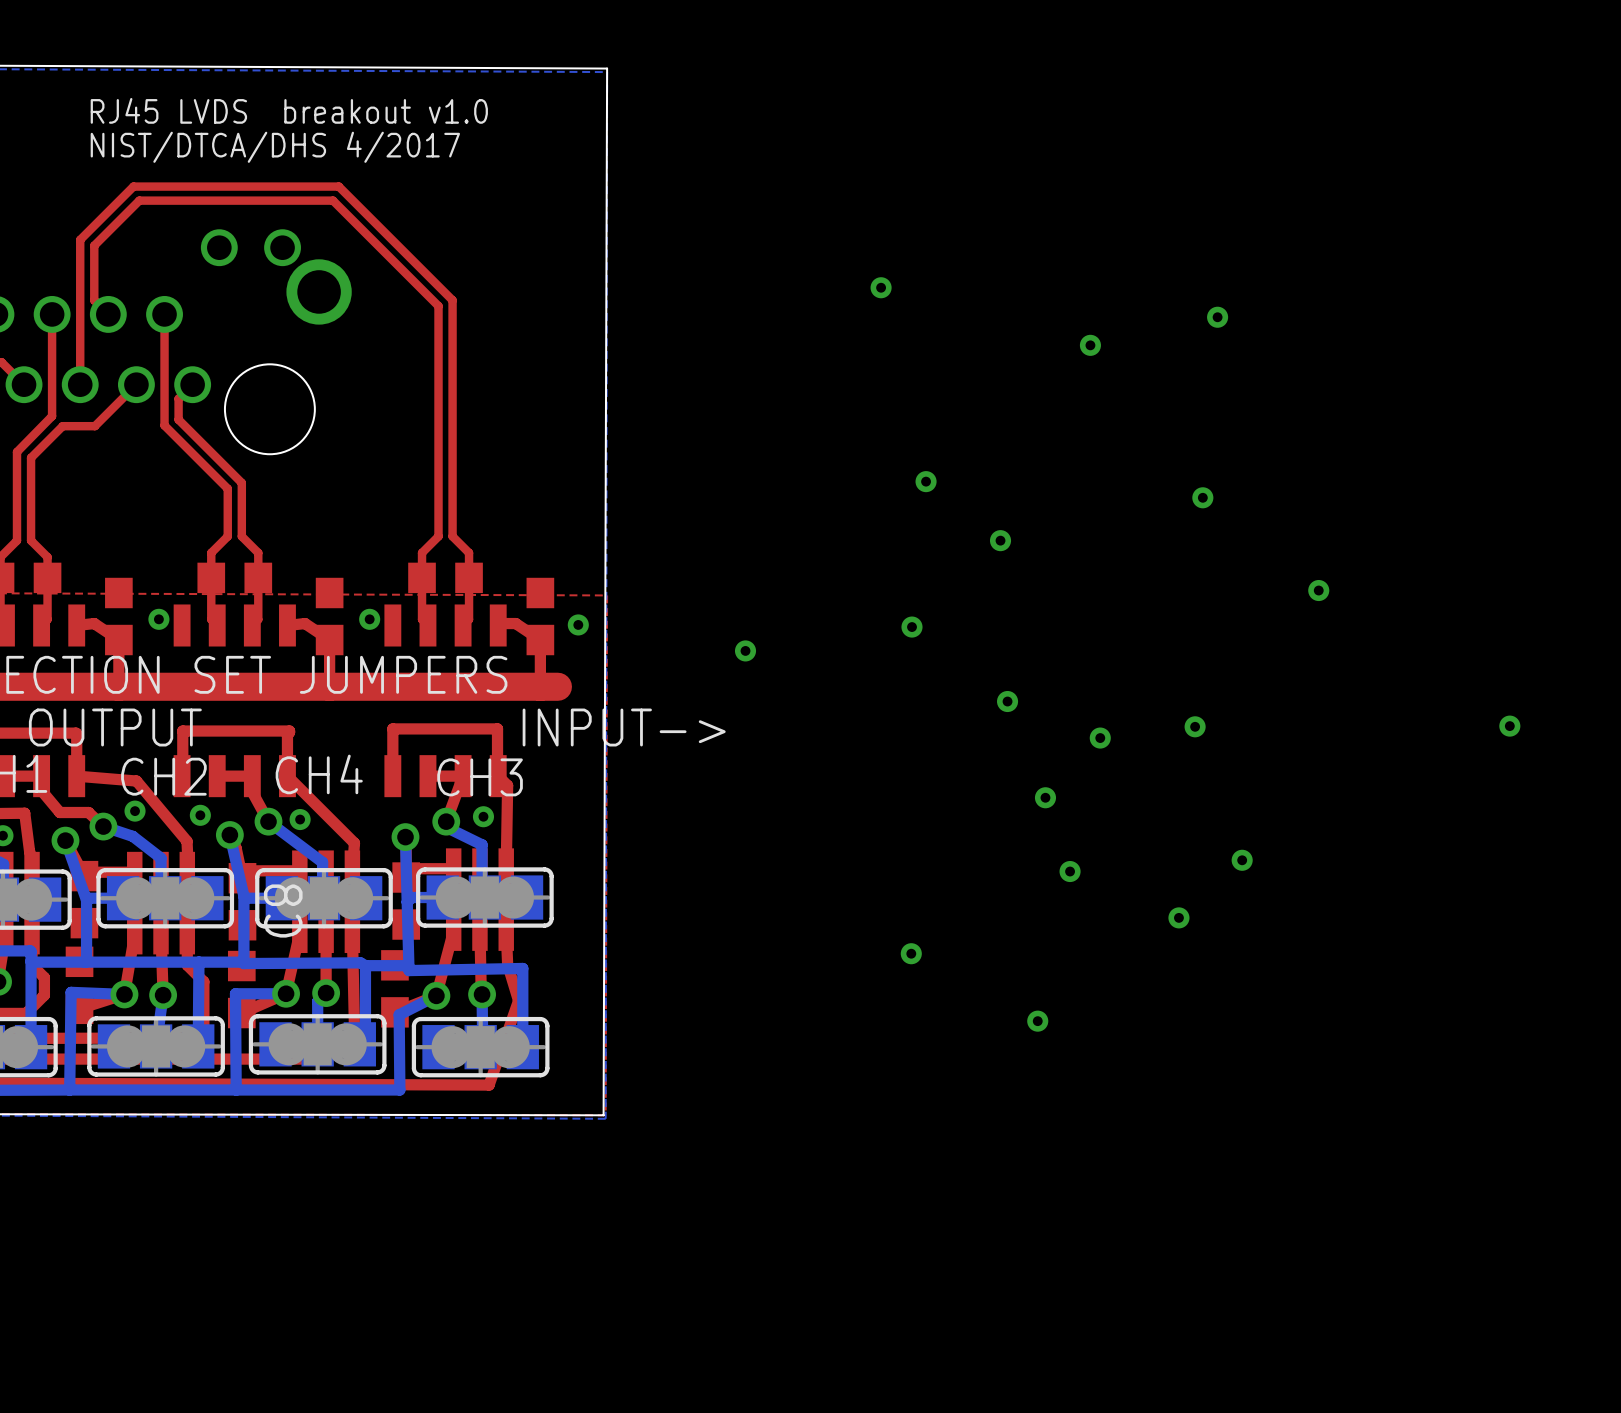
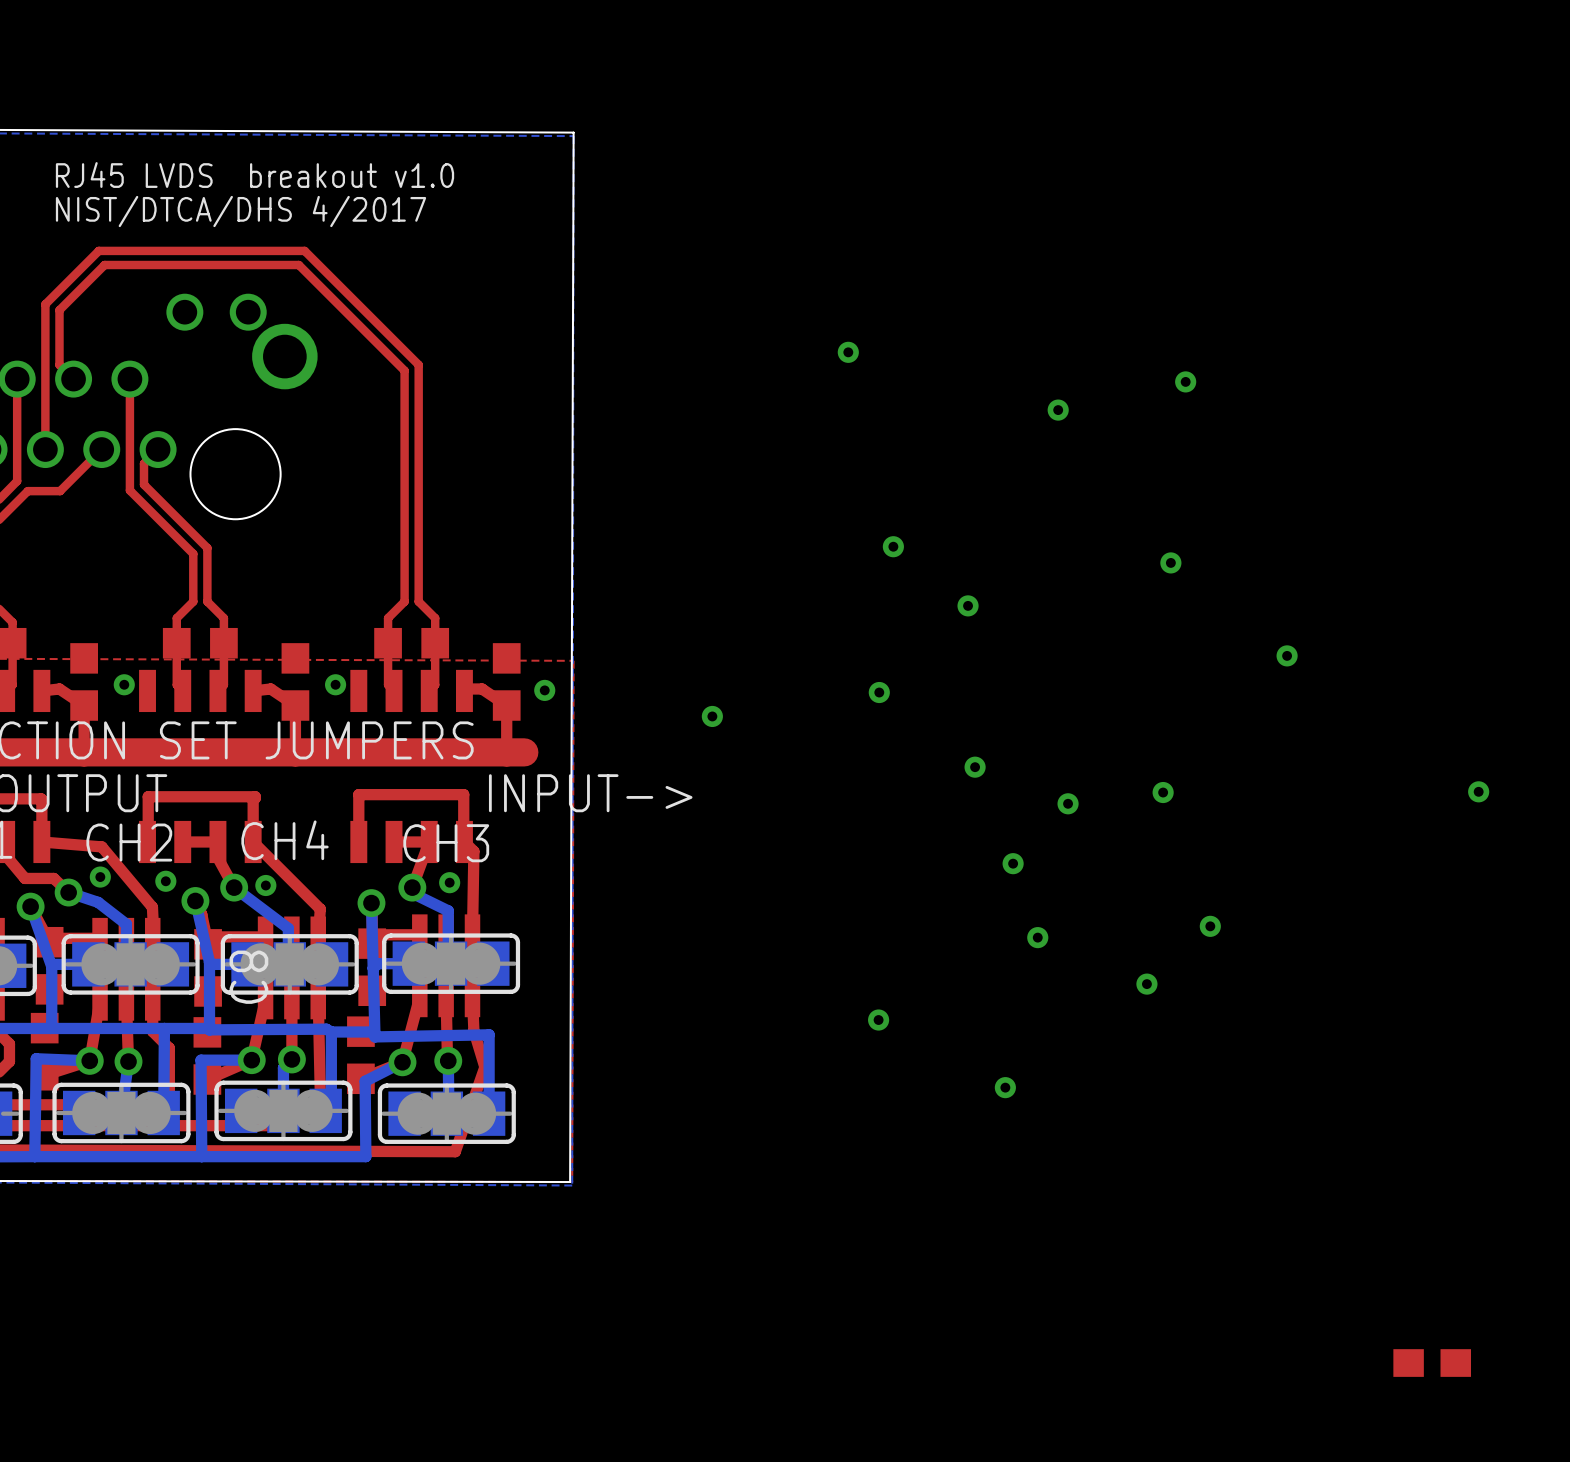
part: none -> (1432, 1363)

